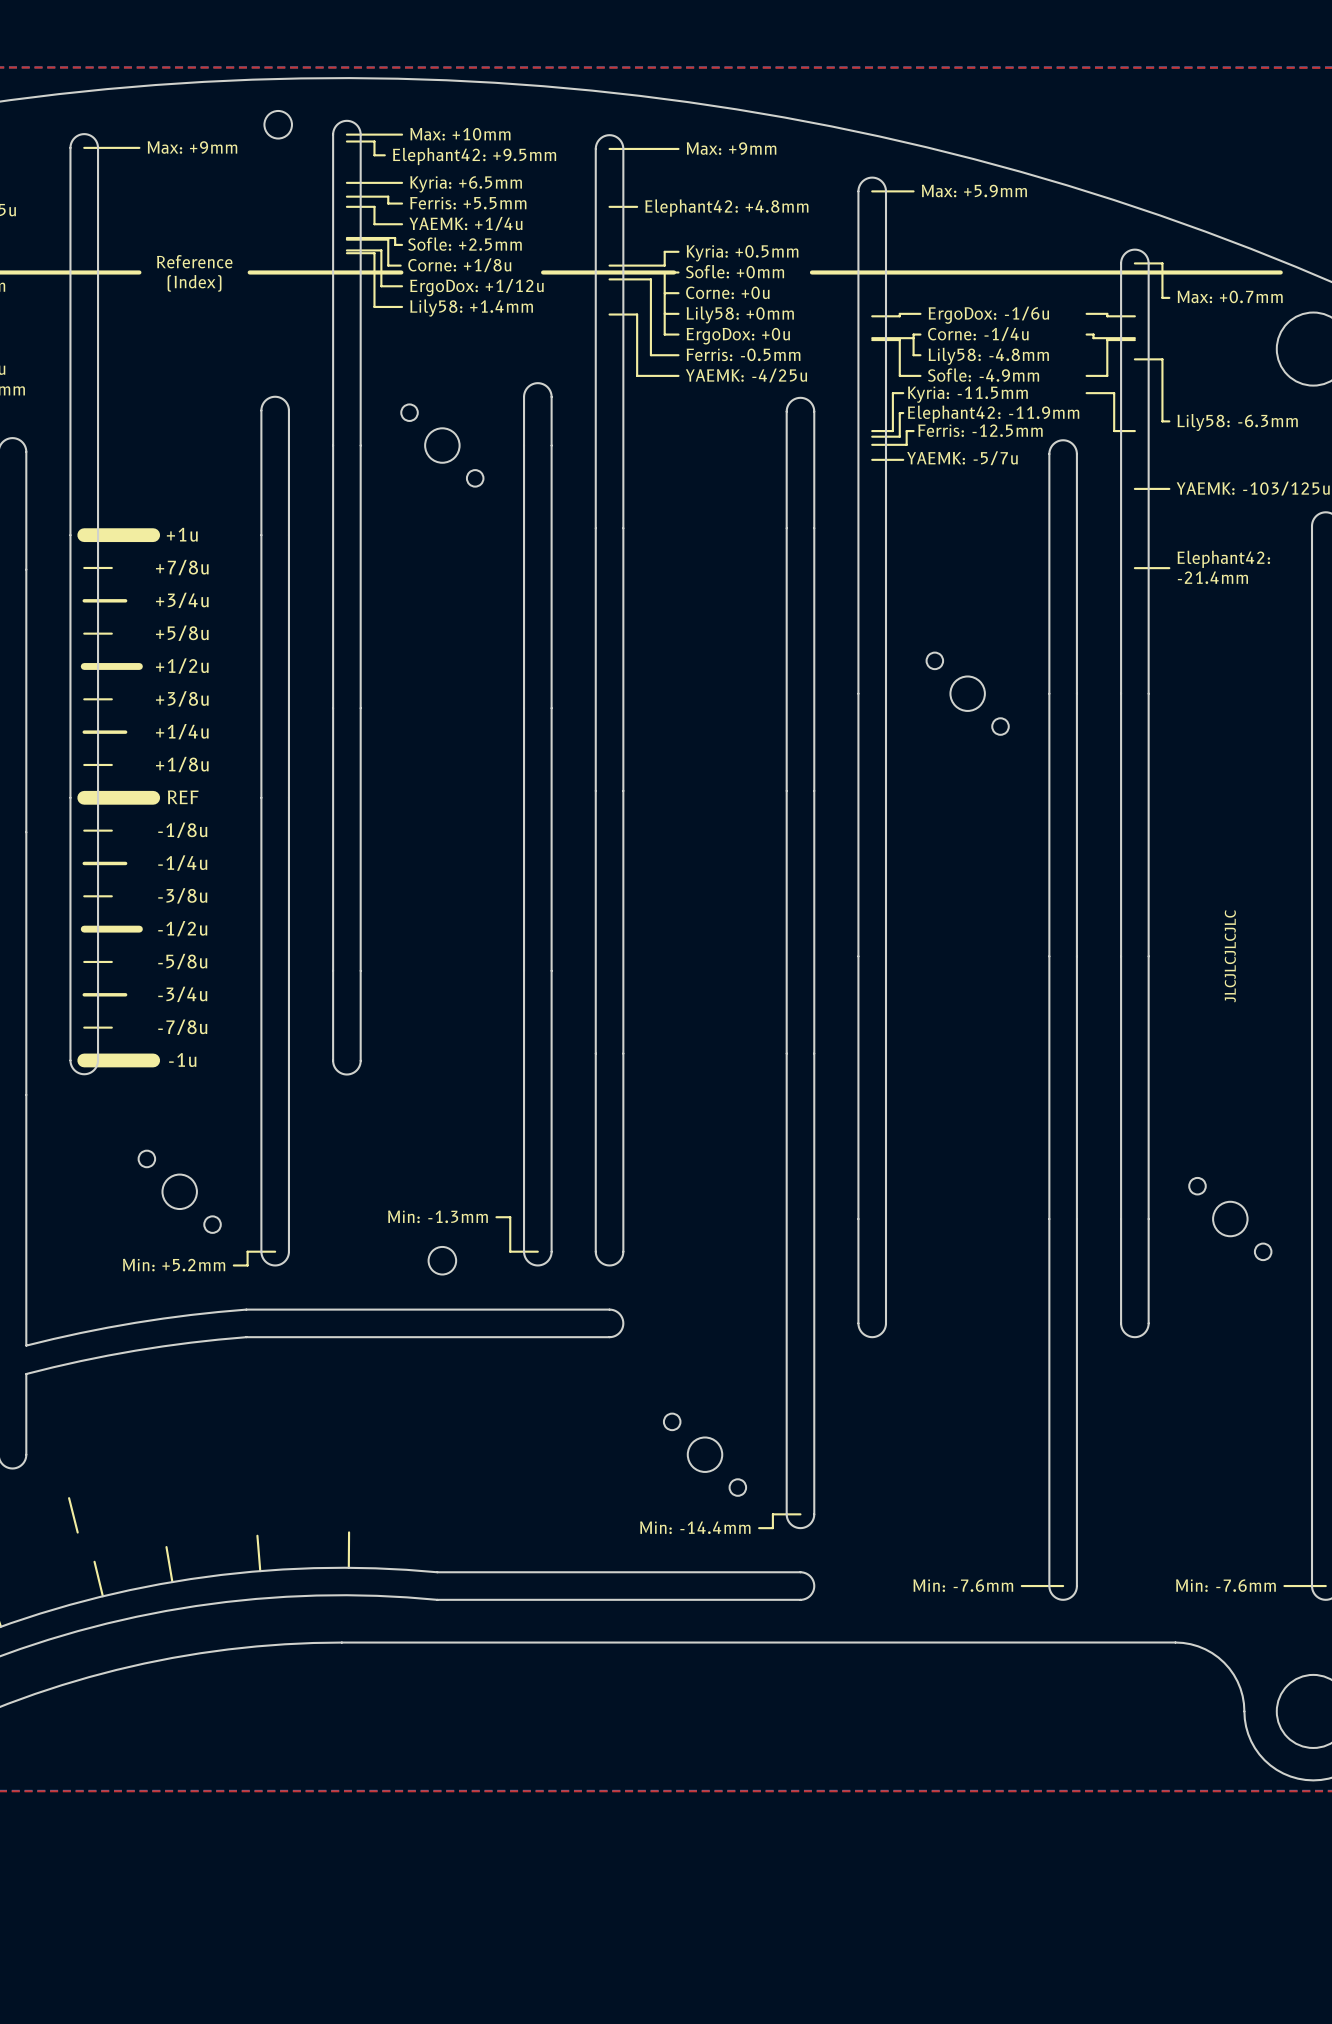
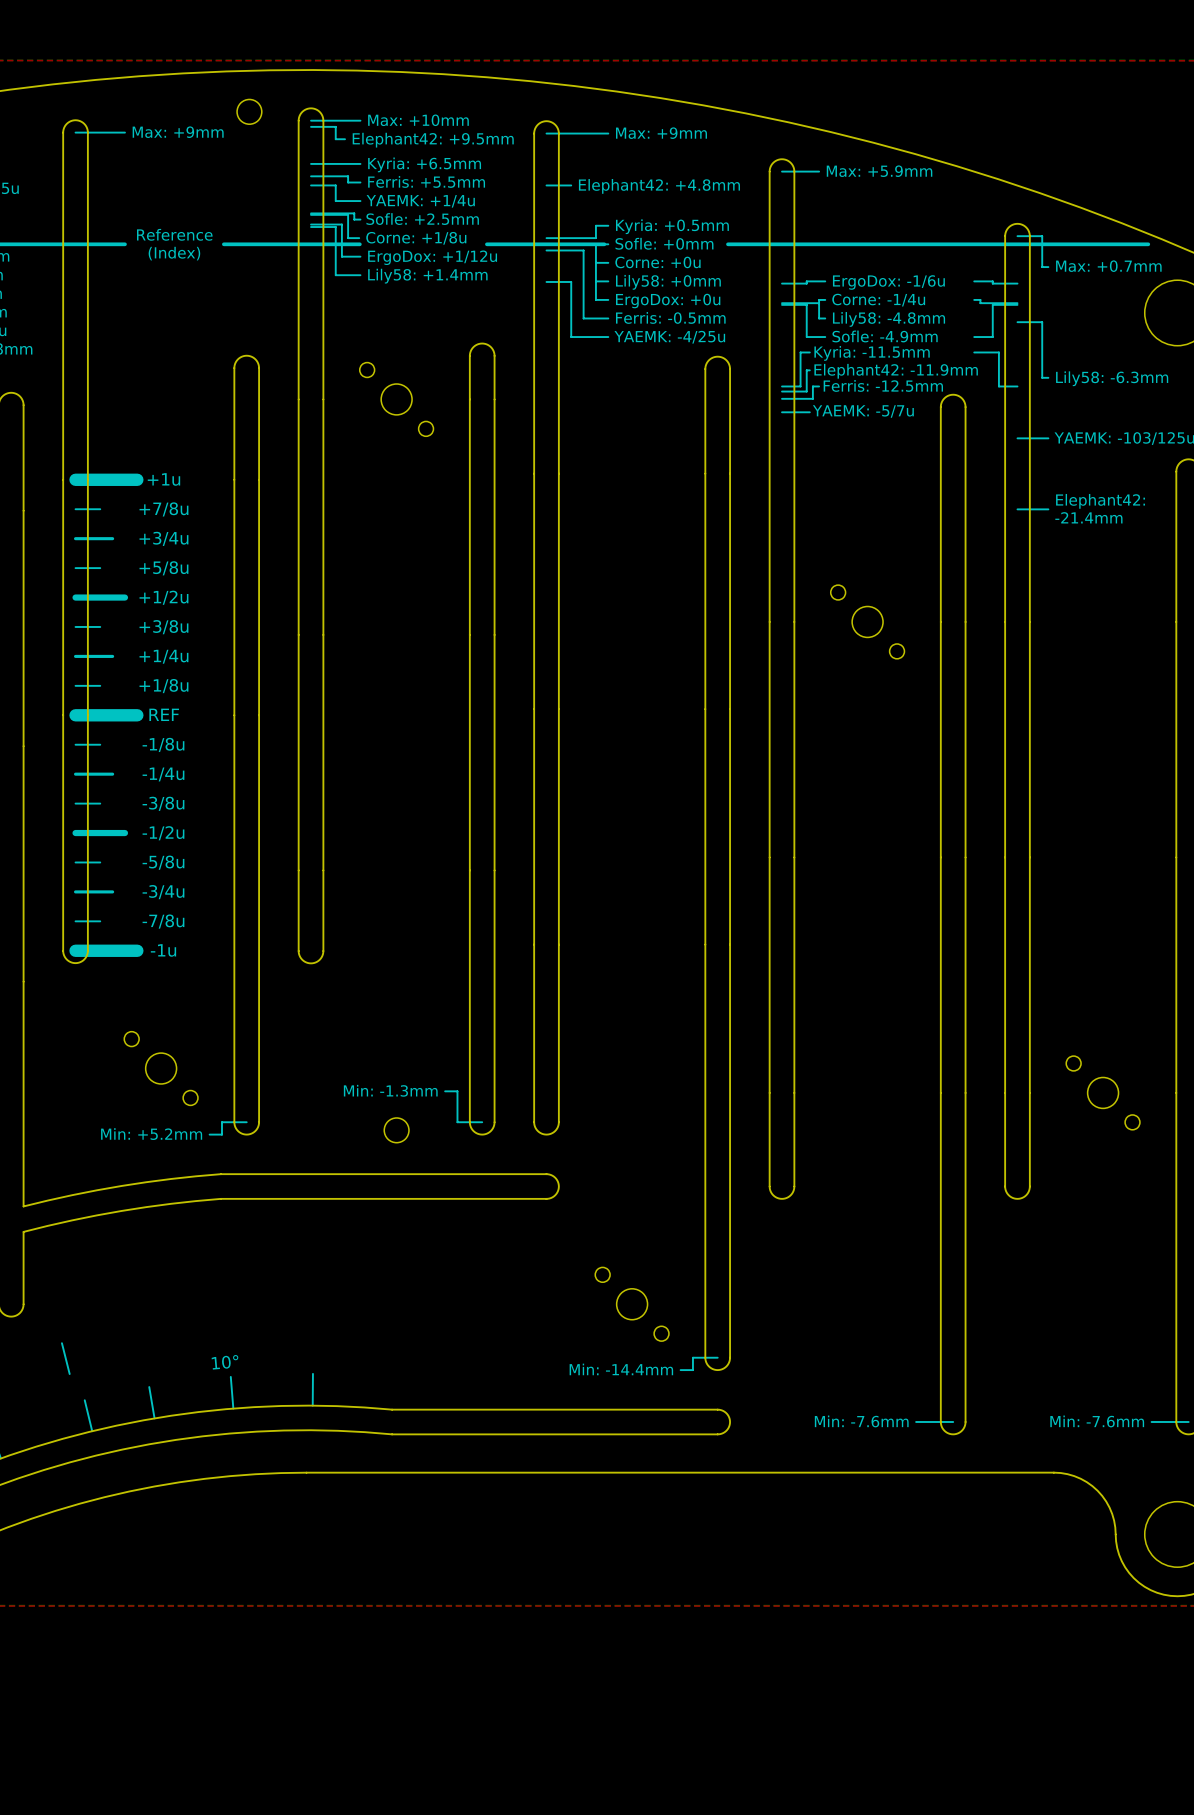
JLCJLCJLCJLC: (1230, 956) -> none
drawing shape: [256, 1534, 262, 1573] -> [211, 1354, 239, 1410]

